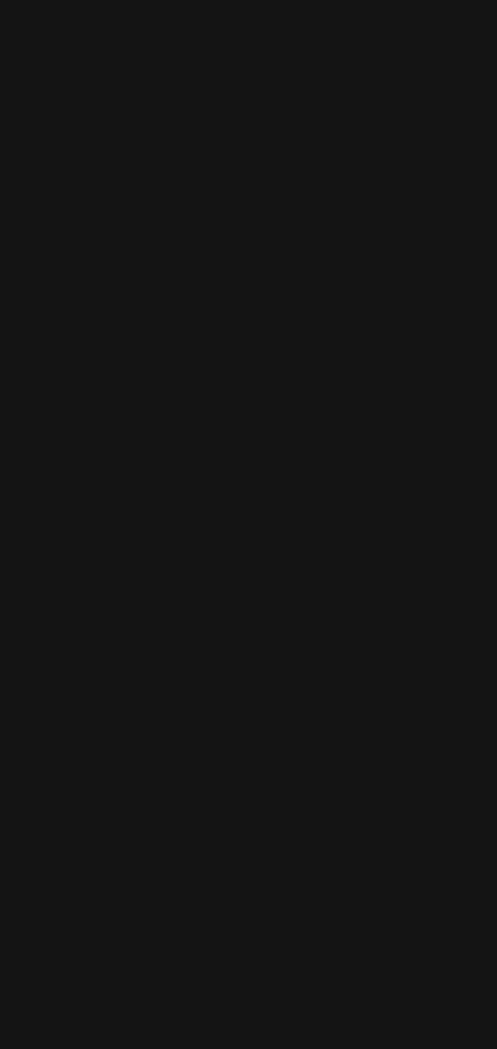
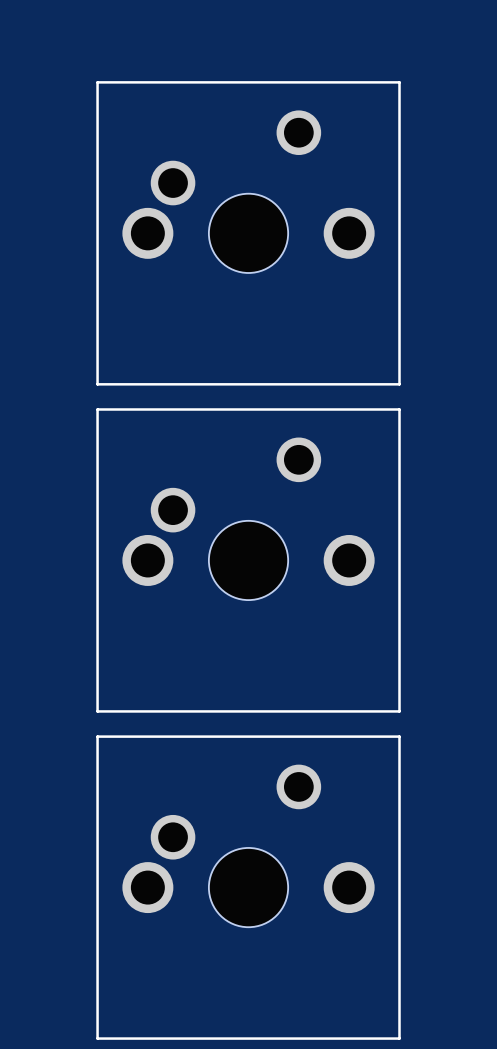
part: none -> (248, 233)
part: none -> (248, 560)
part: none -> (248, 887)

